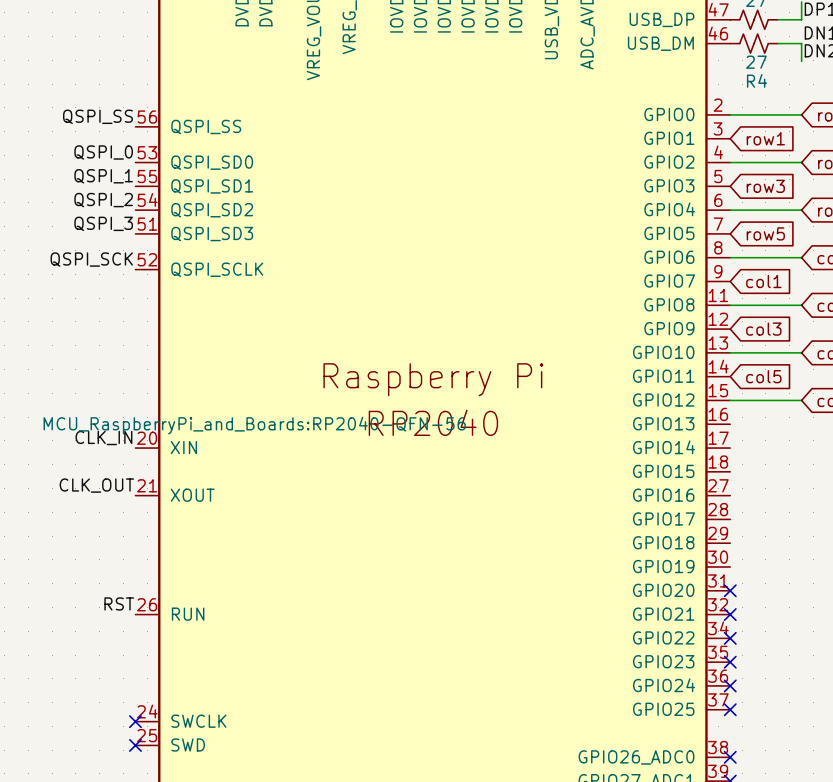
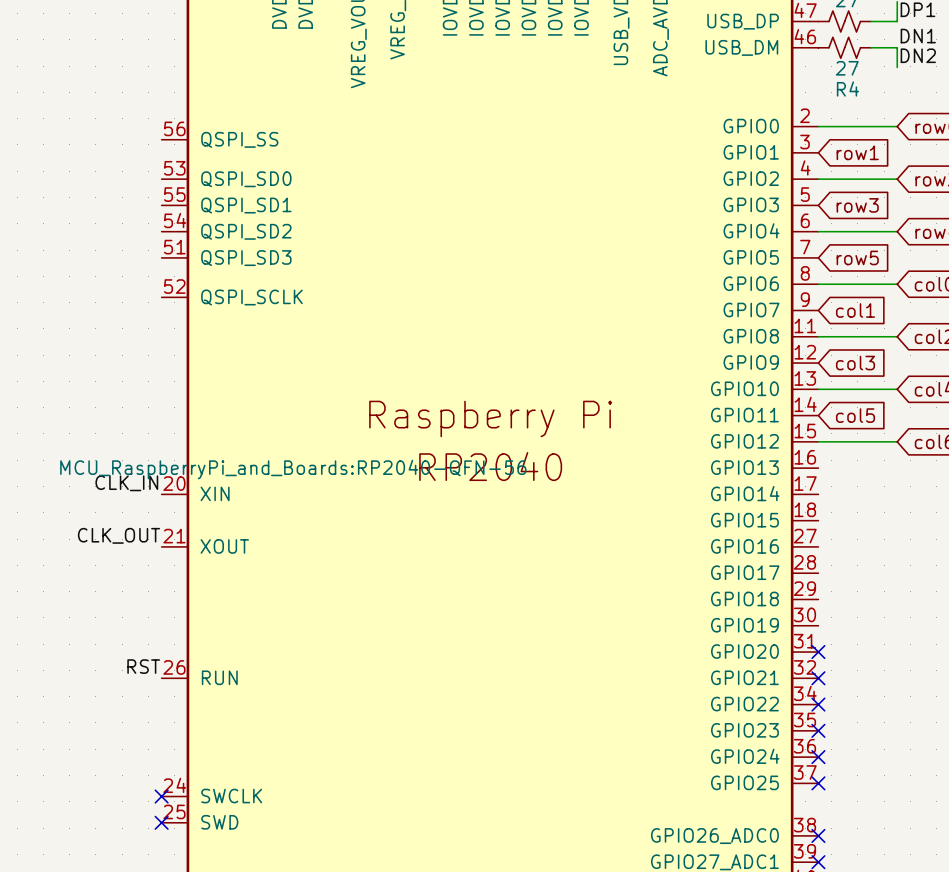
label: QSPI_SS (97, 116) -> none
label: QSPI_0 (103, 152) -> none
label: QSPI_1 (103, 176) -> none
label: QSPI_2 (103, 200) -> none
label: QSPI_3 (103, 223) -> none
label: QSPI_SCK (91, 259) -> none

